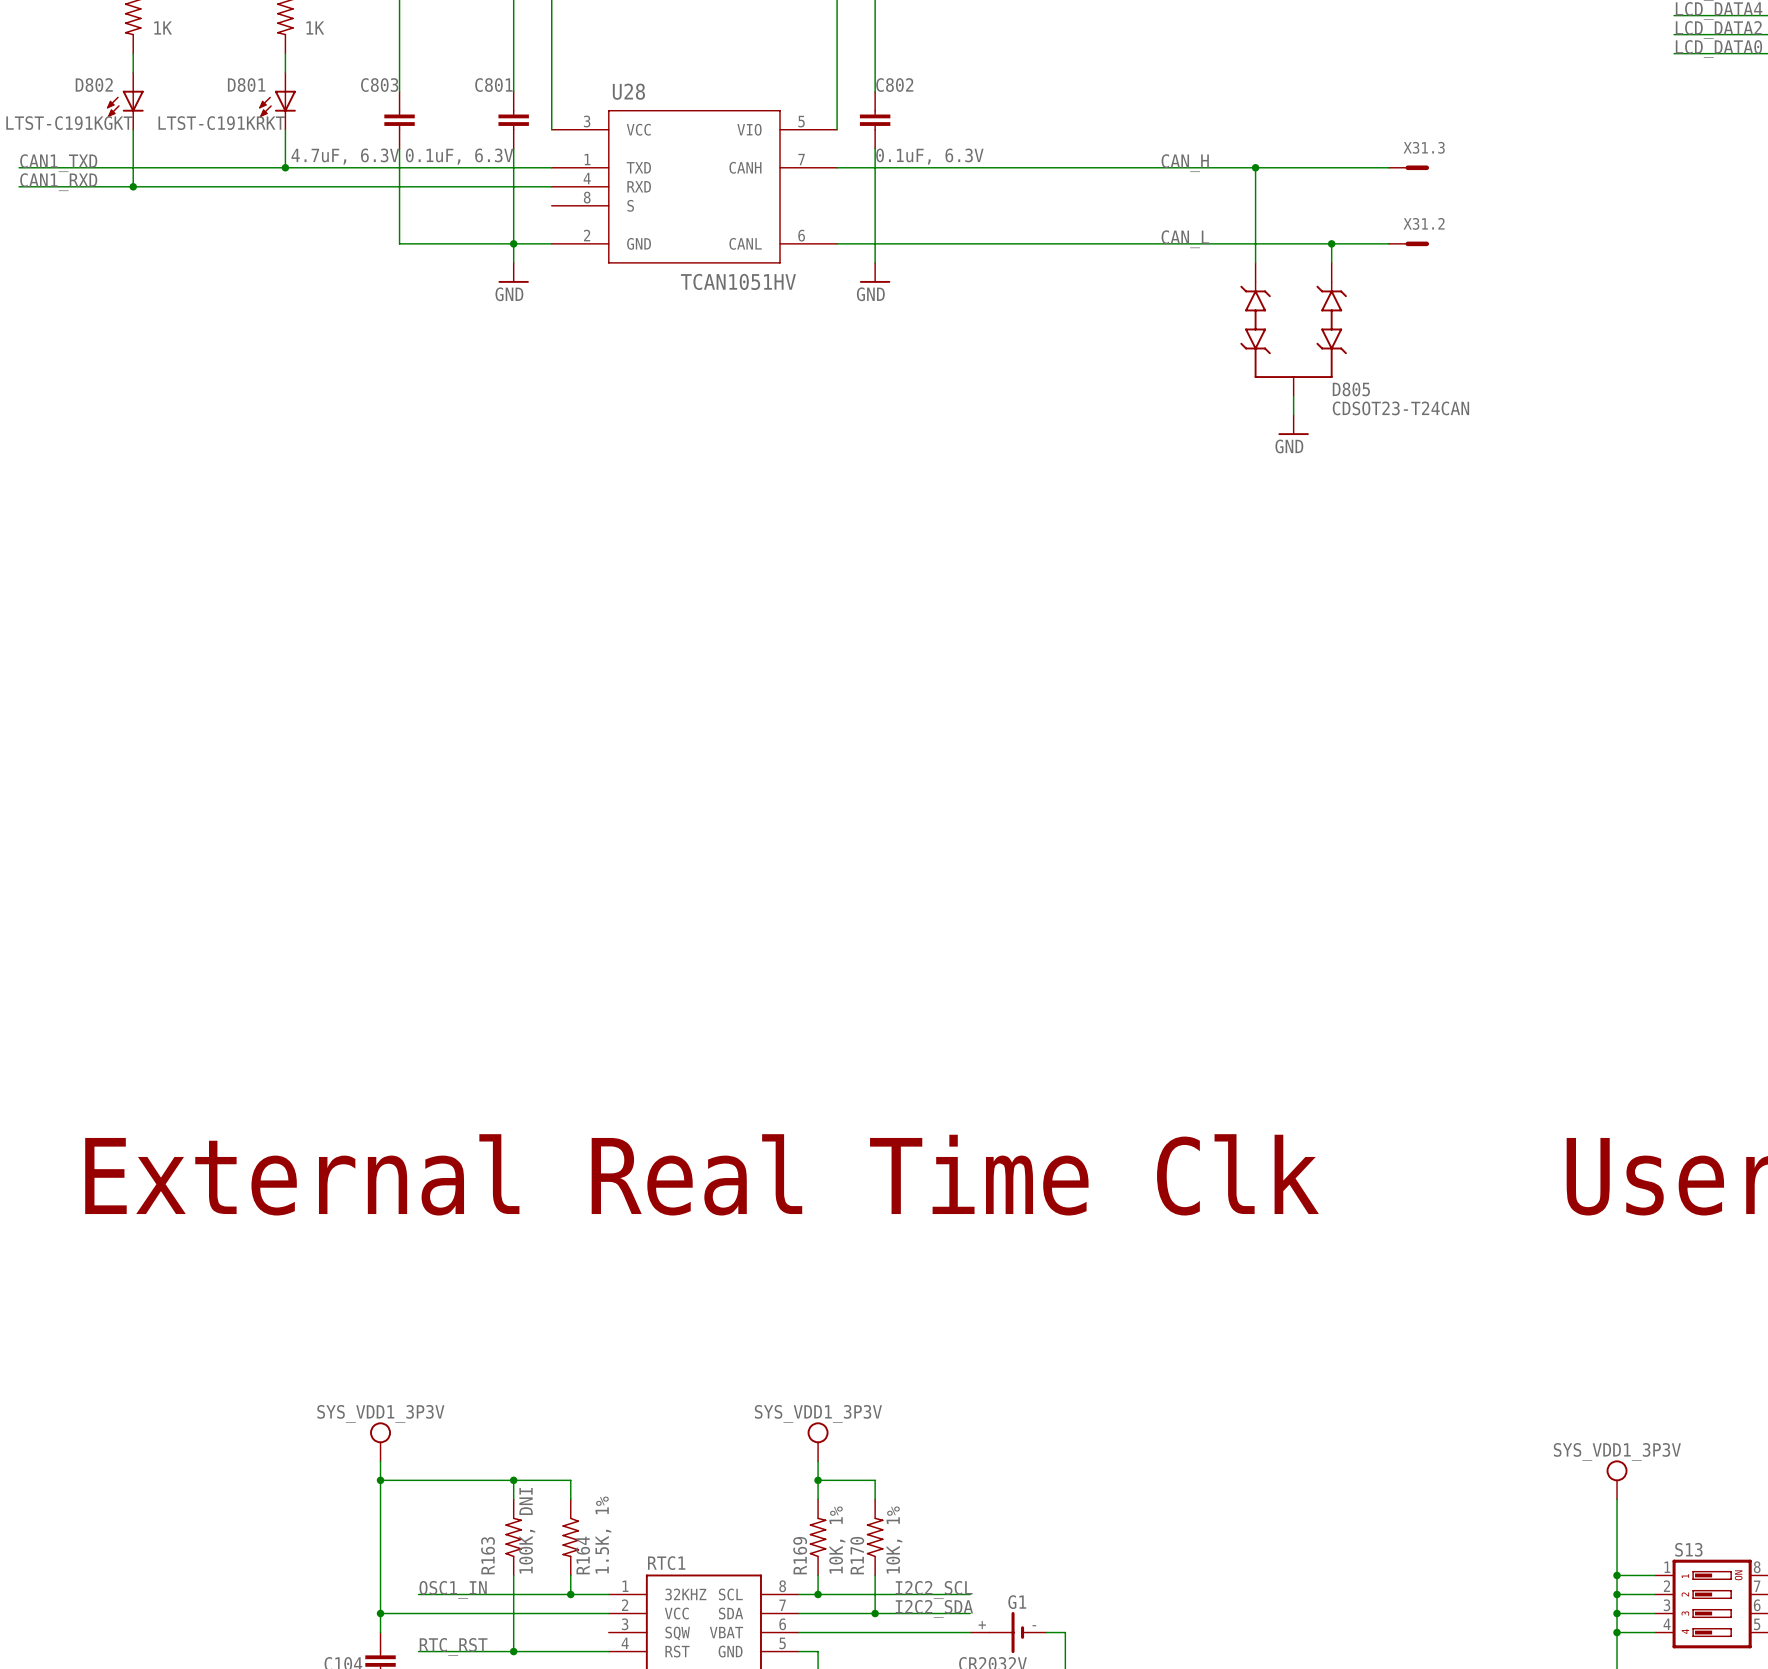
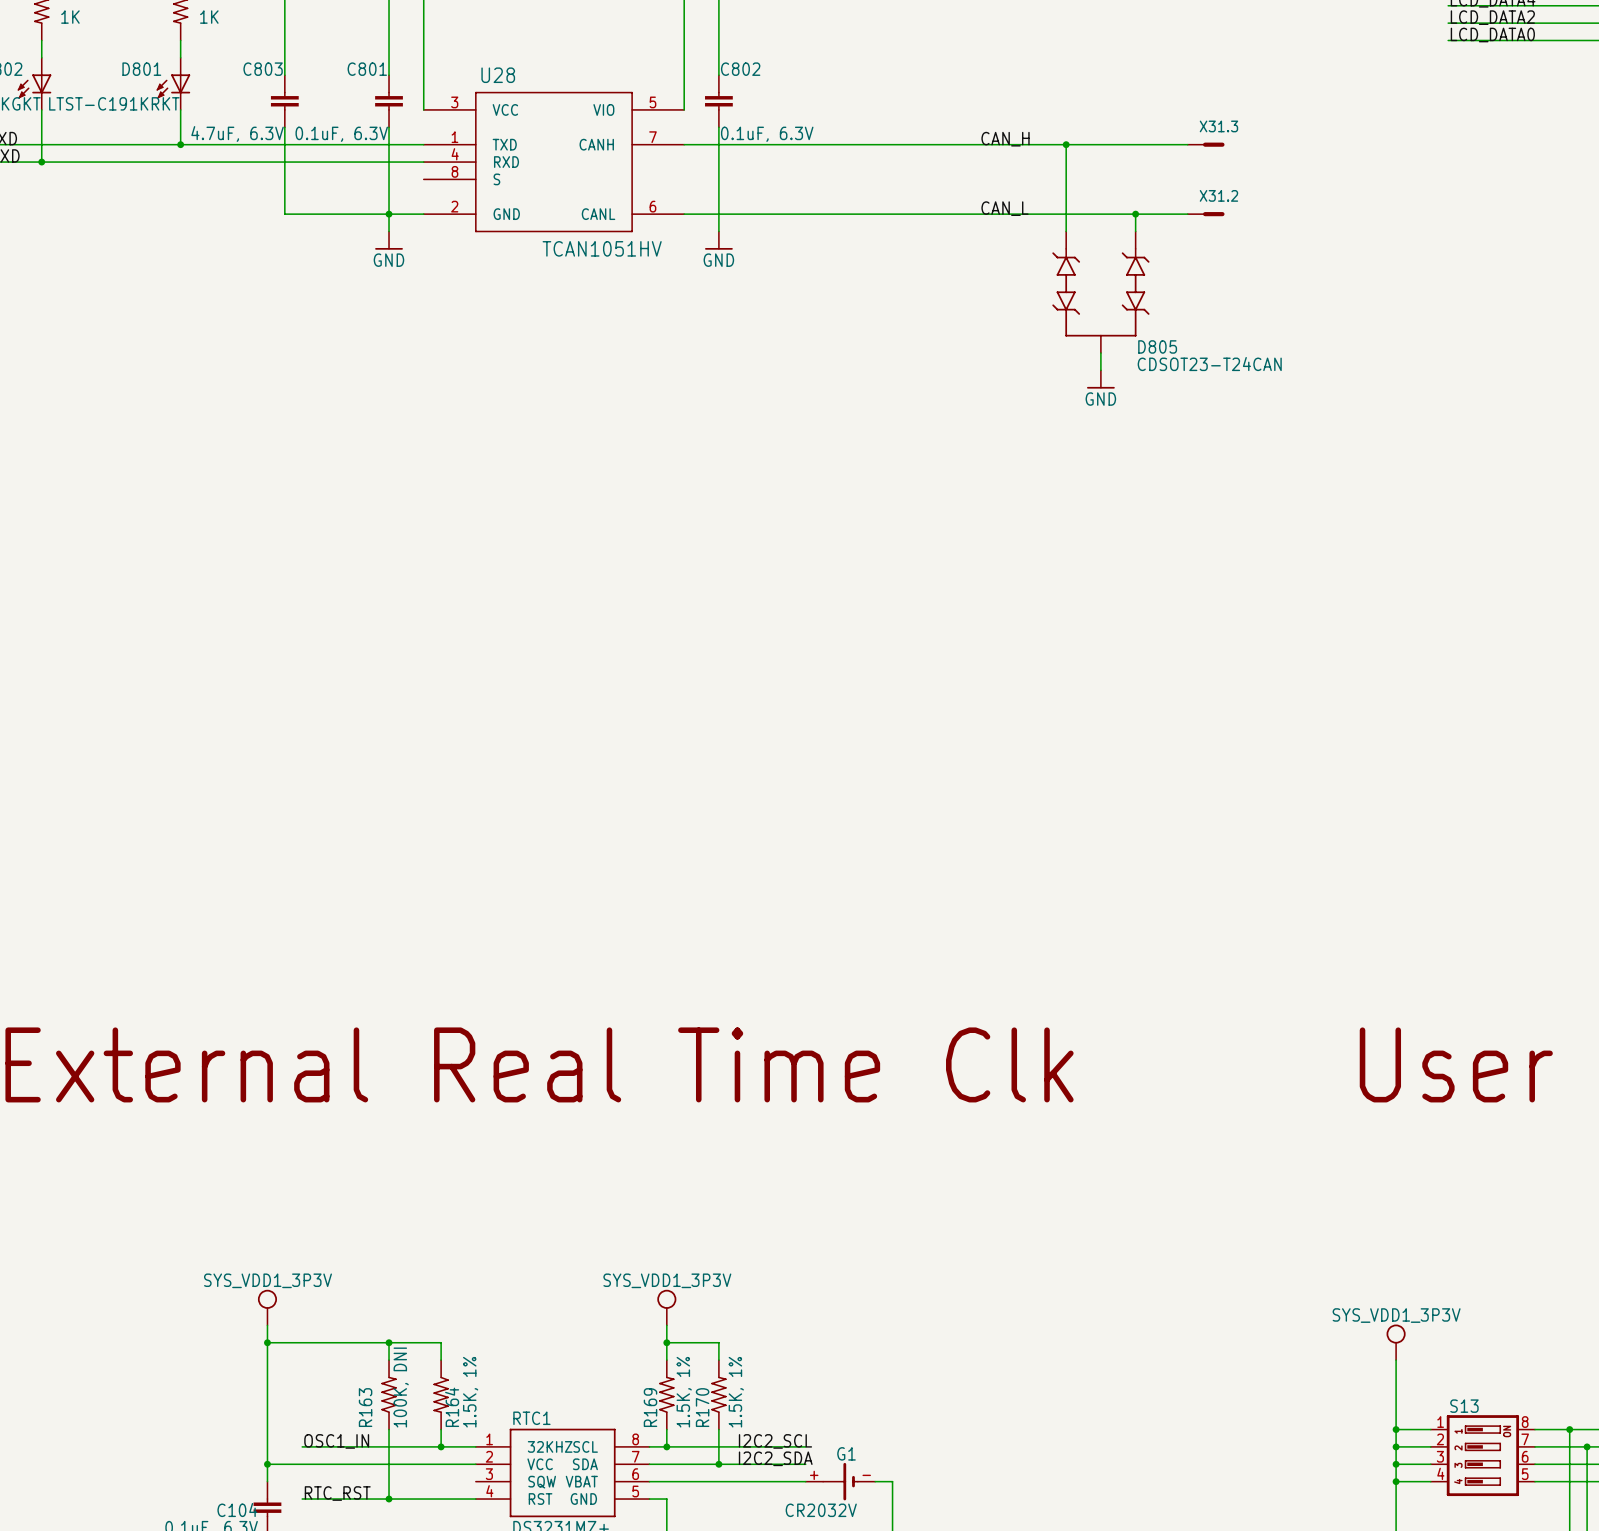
R169 value: 10K, 1% (837, 1539) -> 1.5K, 1% (684, 1392)
R170 value: 10K, 1% (894, 1539) -> 1.5K, 1% (736, 1392)

